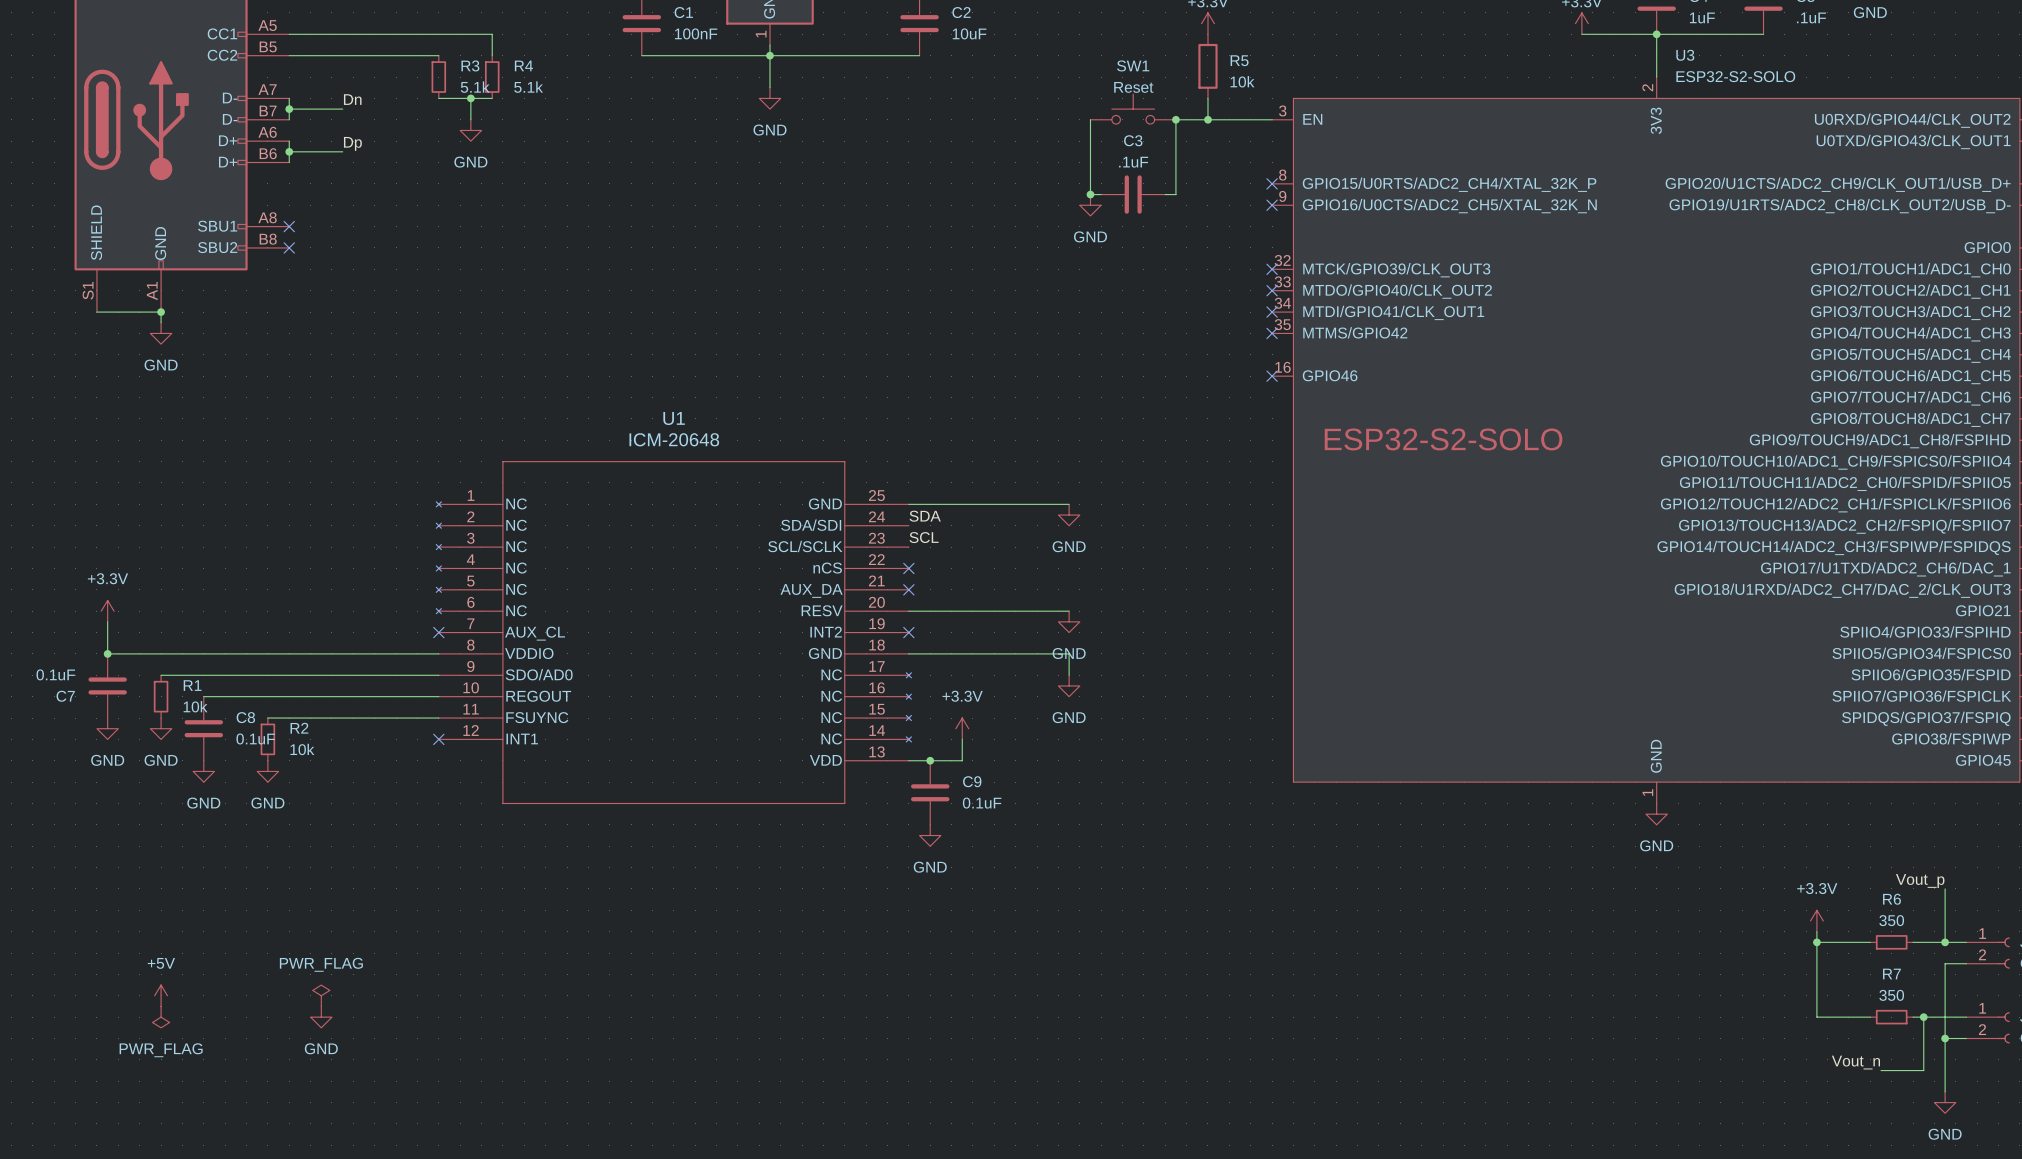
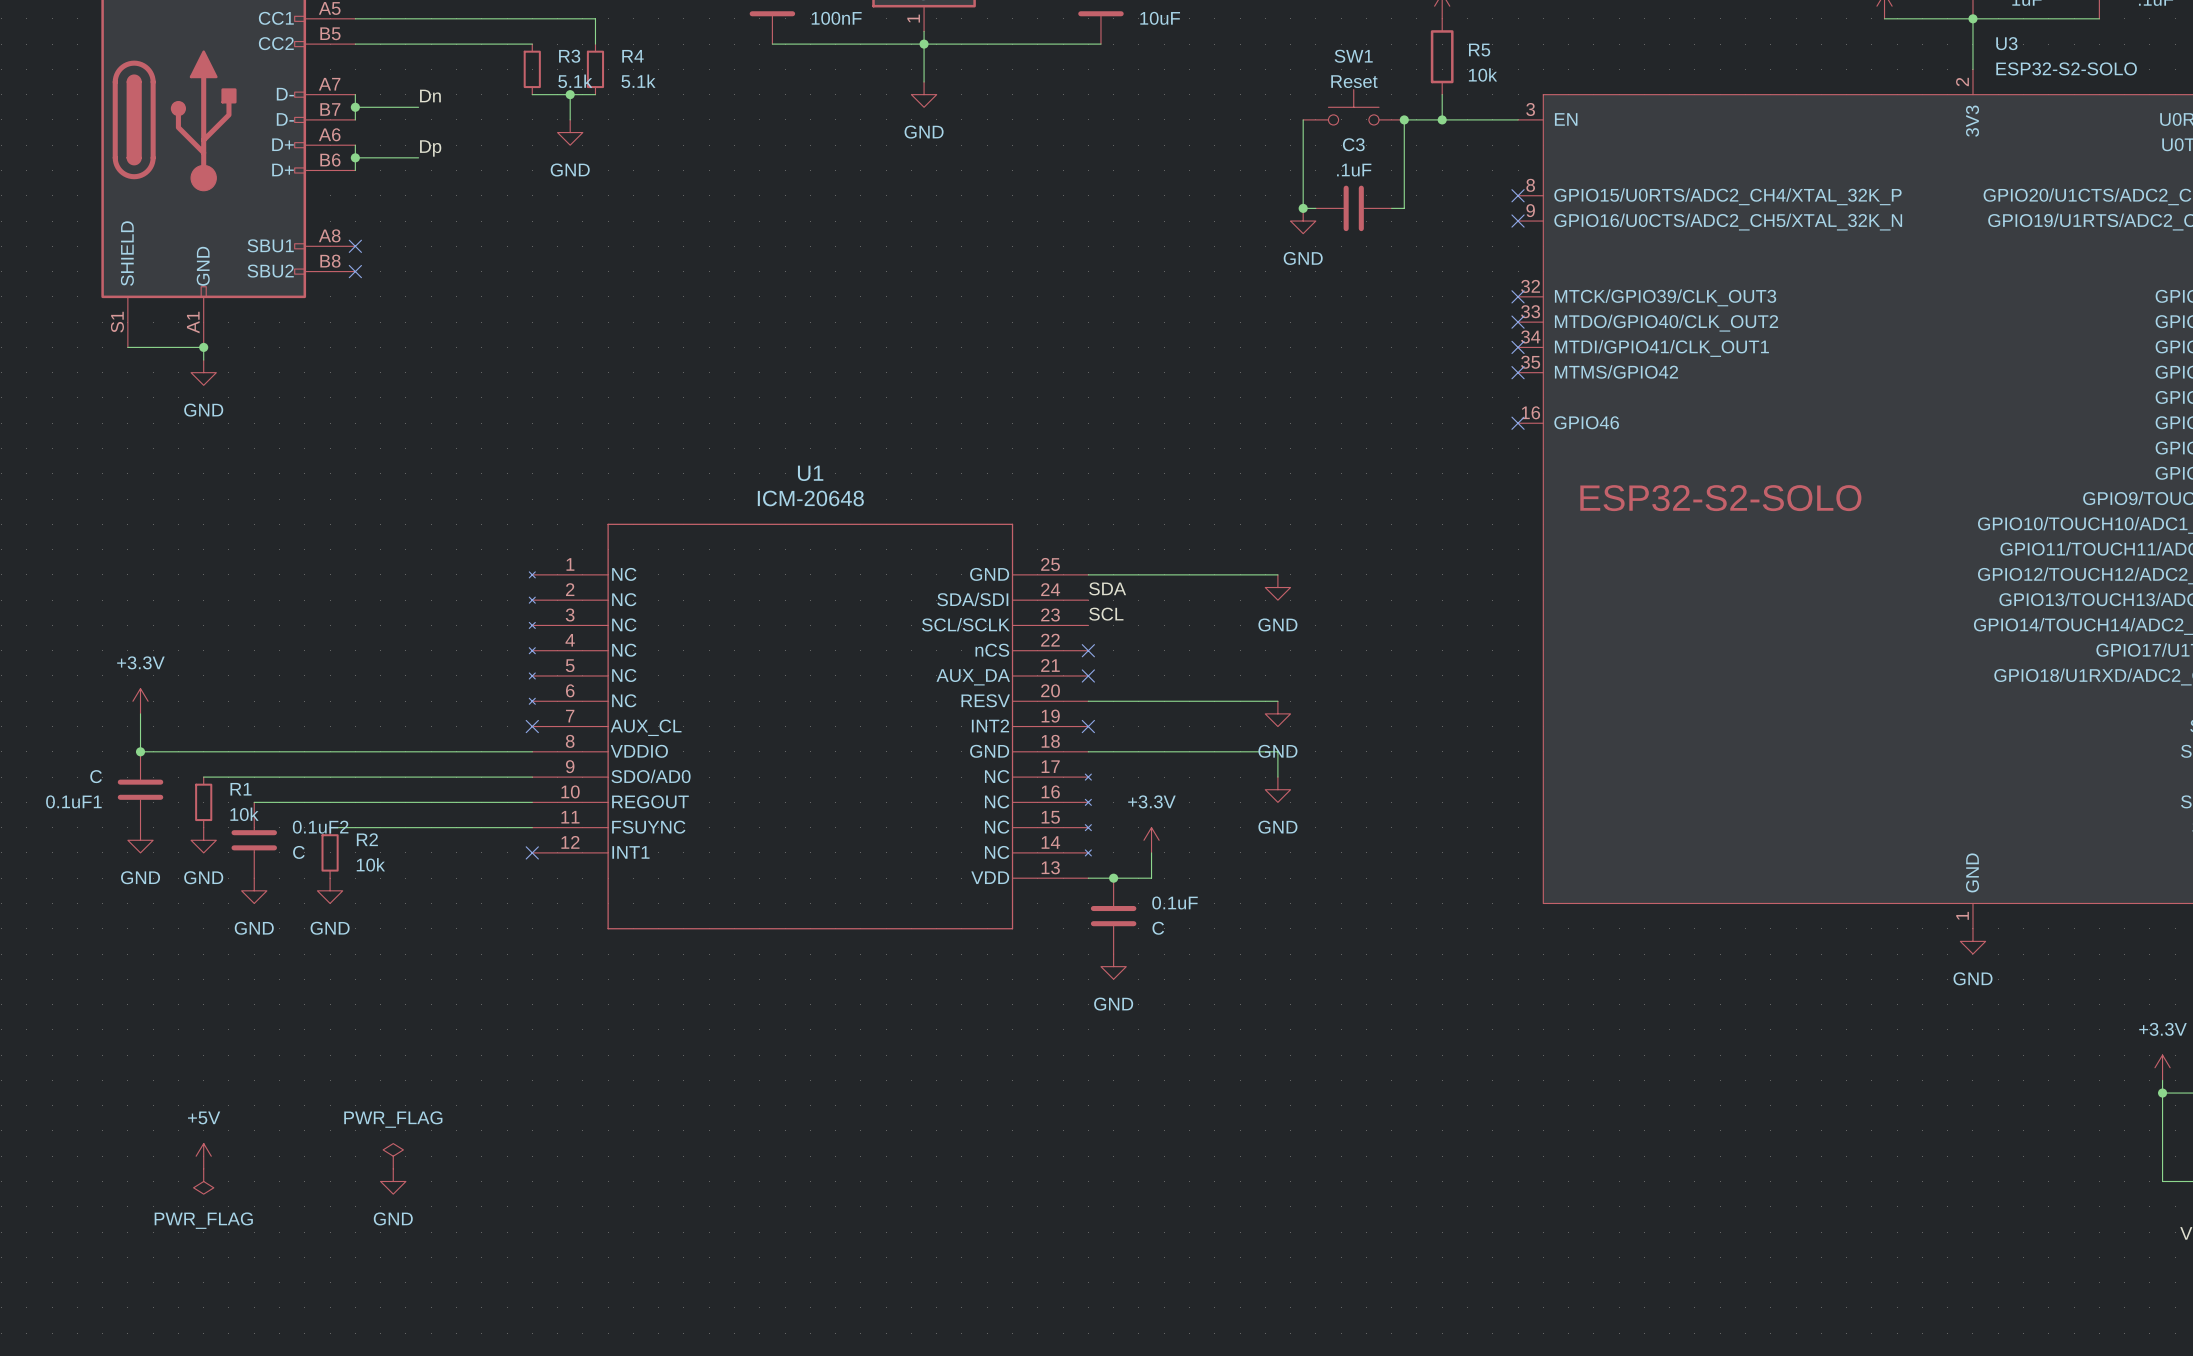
C7 value: 0.1uF (55, 674) -> C (96, 776)
C7 name: C7 (65, 696) -> 0.1uF1 (73, 801)
C8 name: C8 (245, 717) -> 0.1uF2 (320, 827)
C8 value: 0.1uF (255, 738) -> C (298, 852)
C9 name: C9 (972, 781) -> 0.1uF (1175, 902)
C9 value: 0.1uF (982, 803) -> C (1158, 928)

